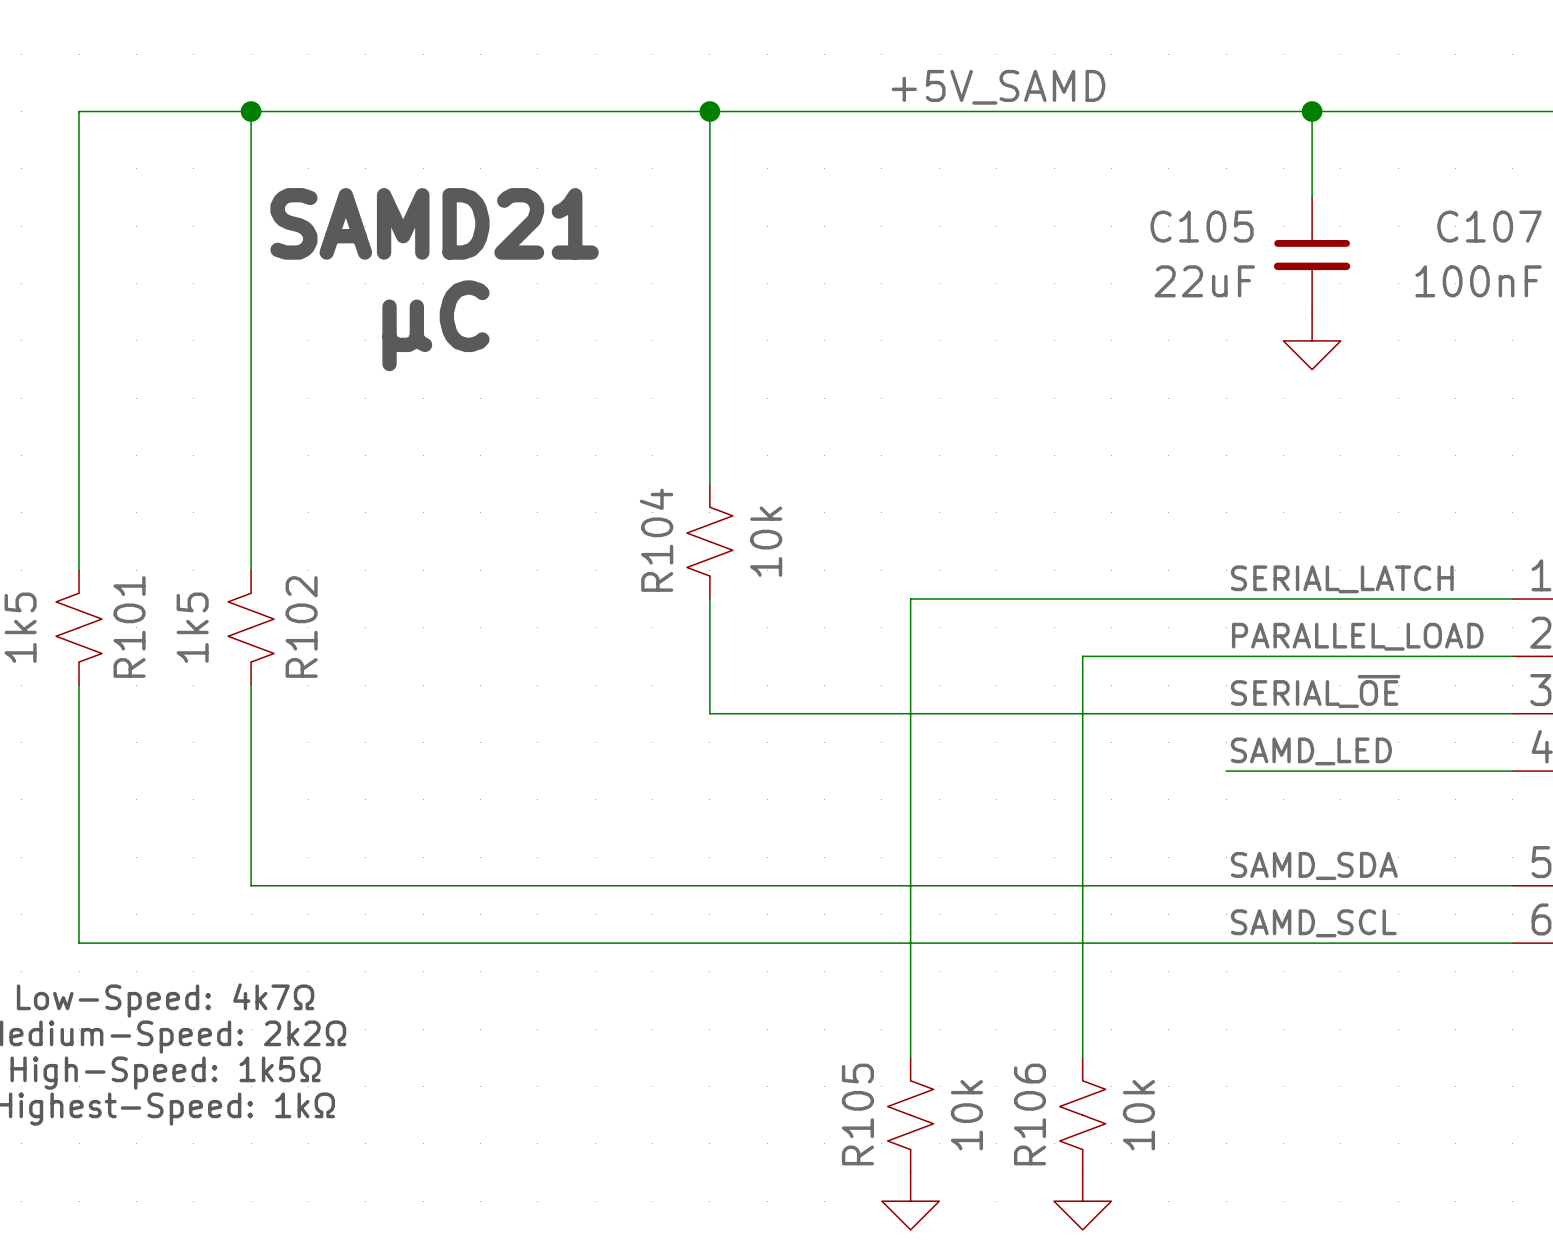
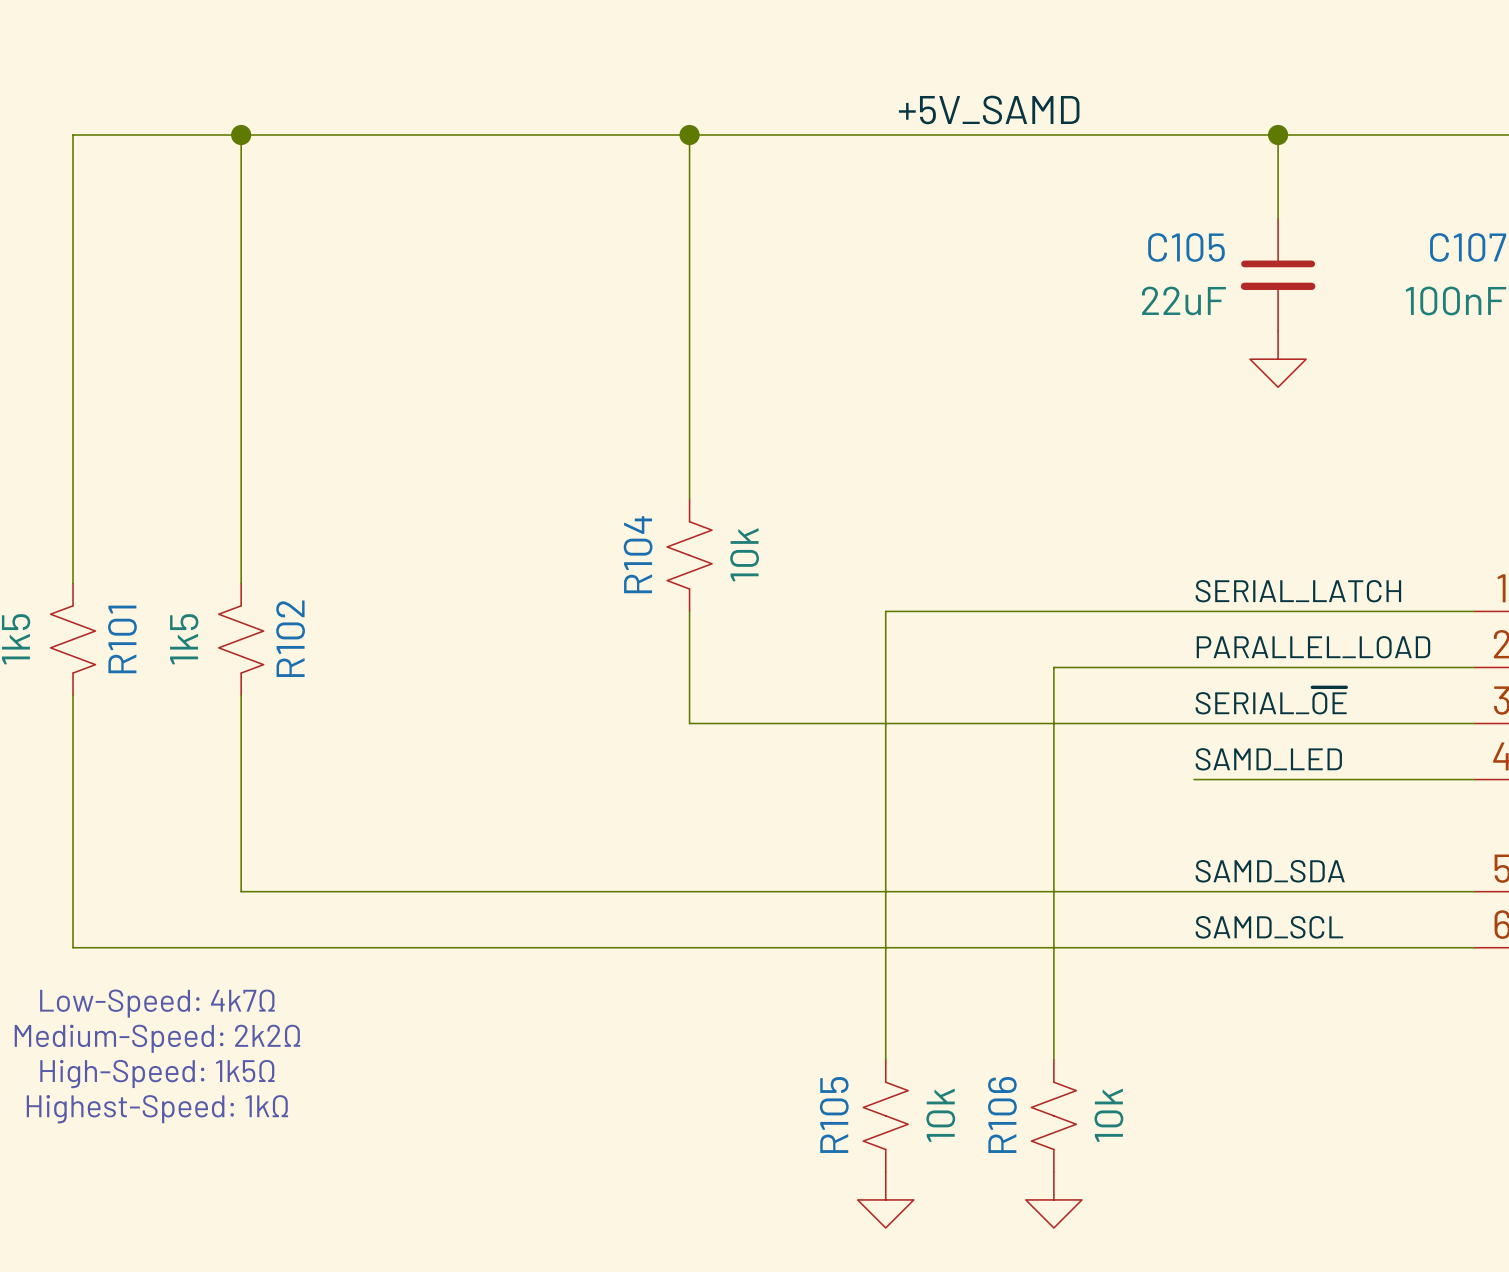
text: SAMD21 (434, 223) -> none
text: µC (435, 325) -> none

